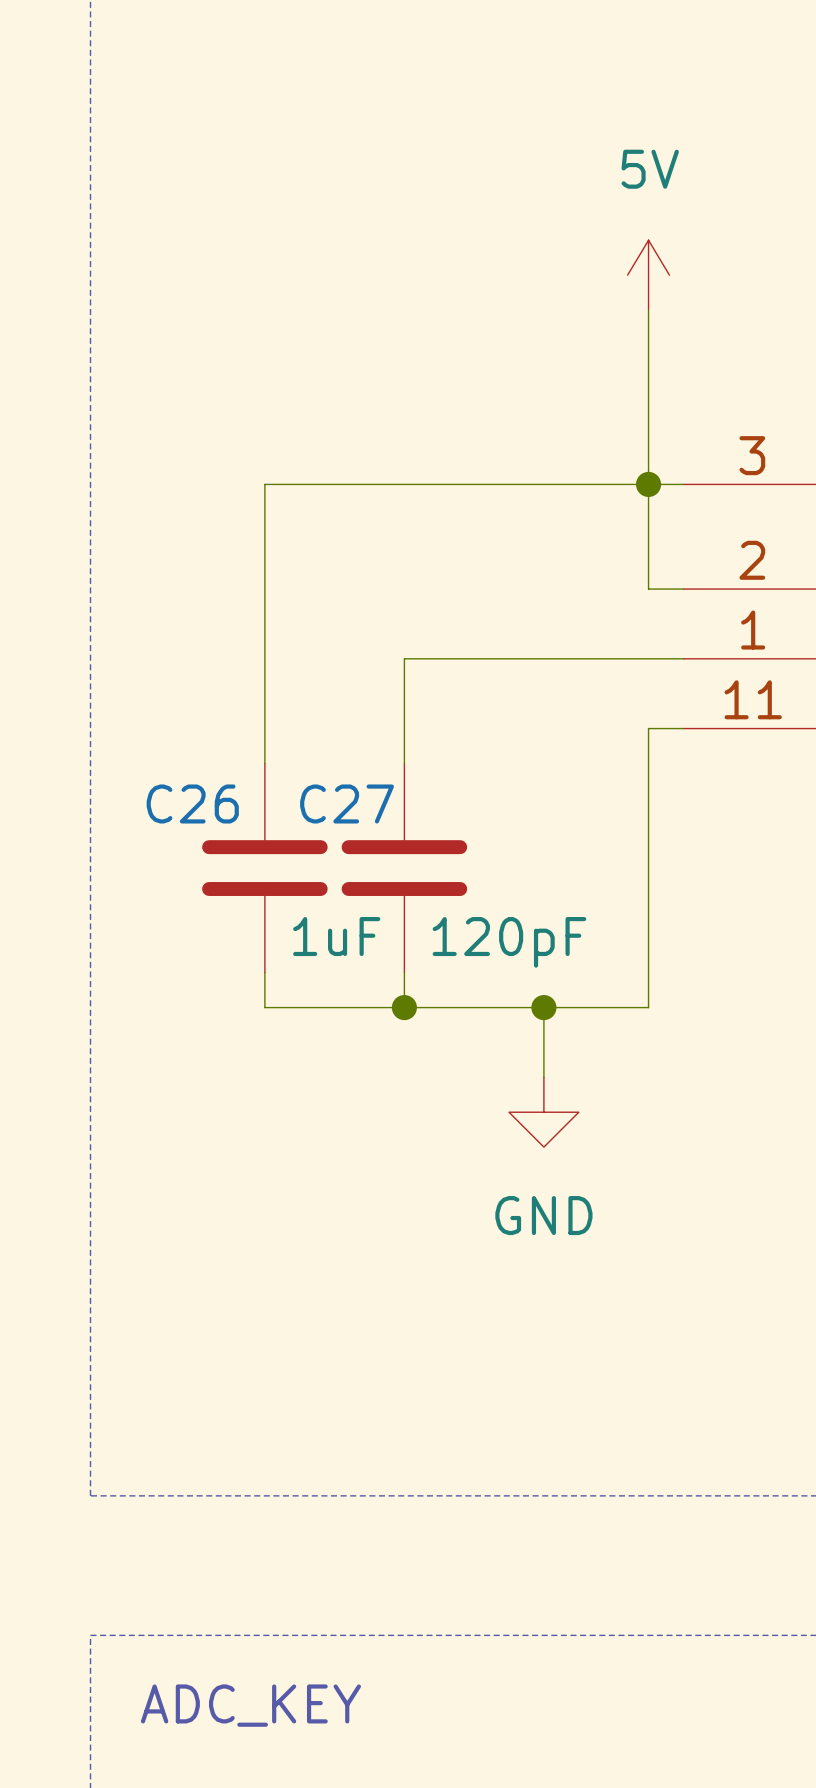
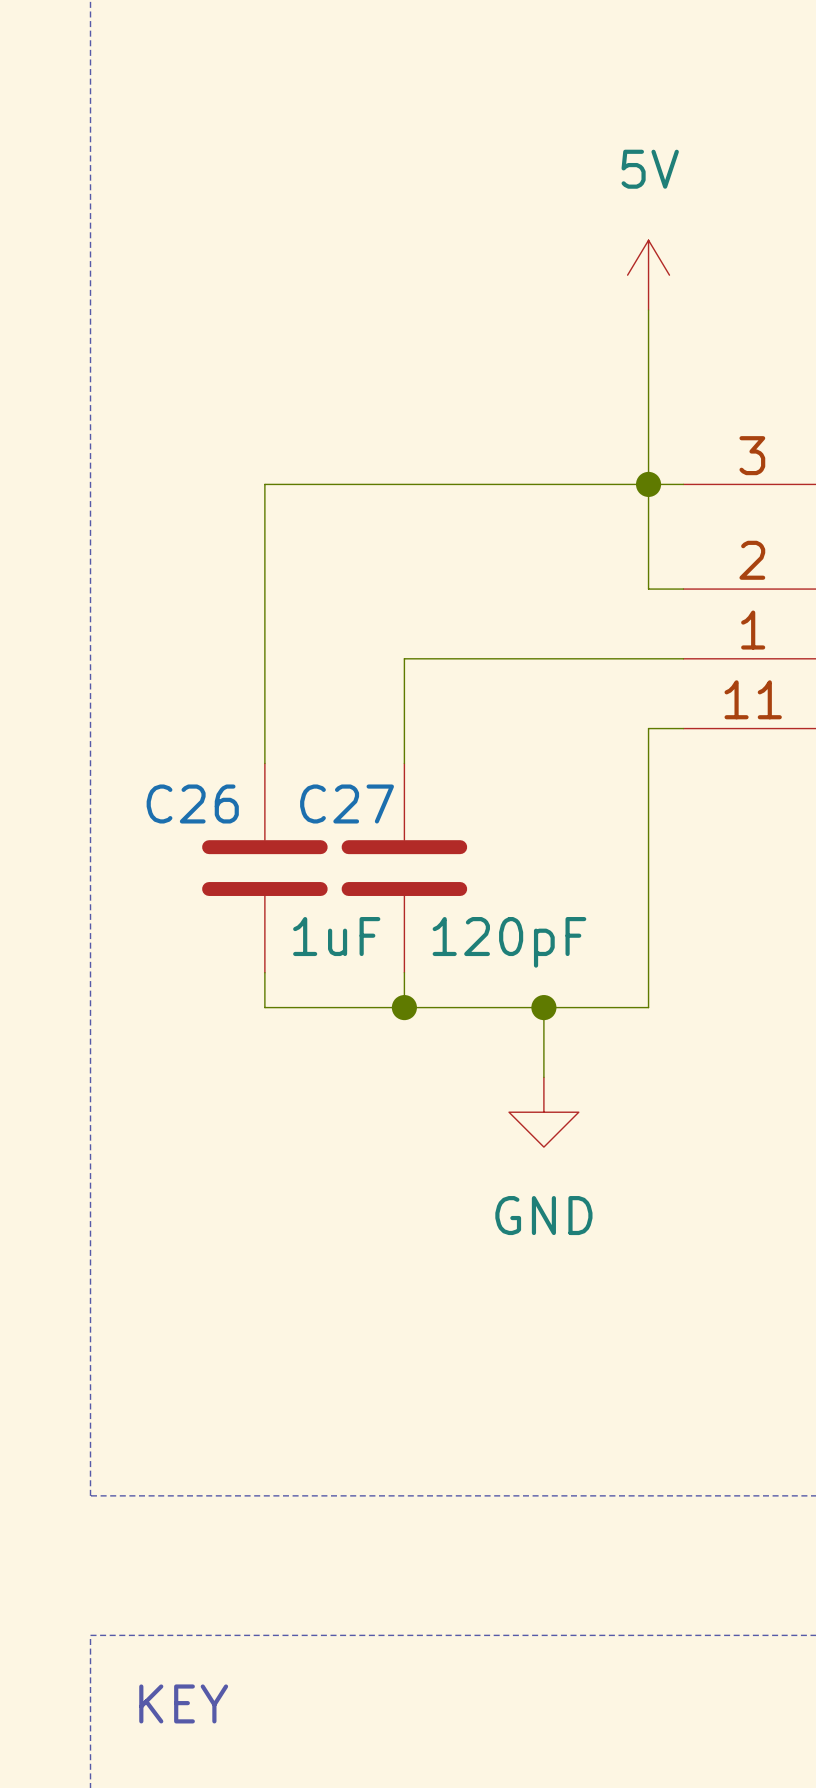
text: none -> KEY (183, 1703)
text: ADC_KEY (250, 1705) -> none

